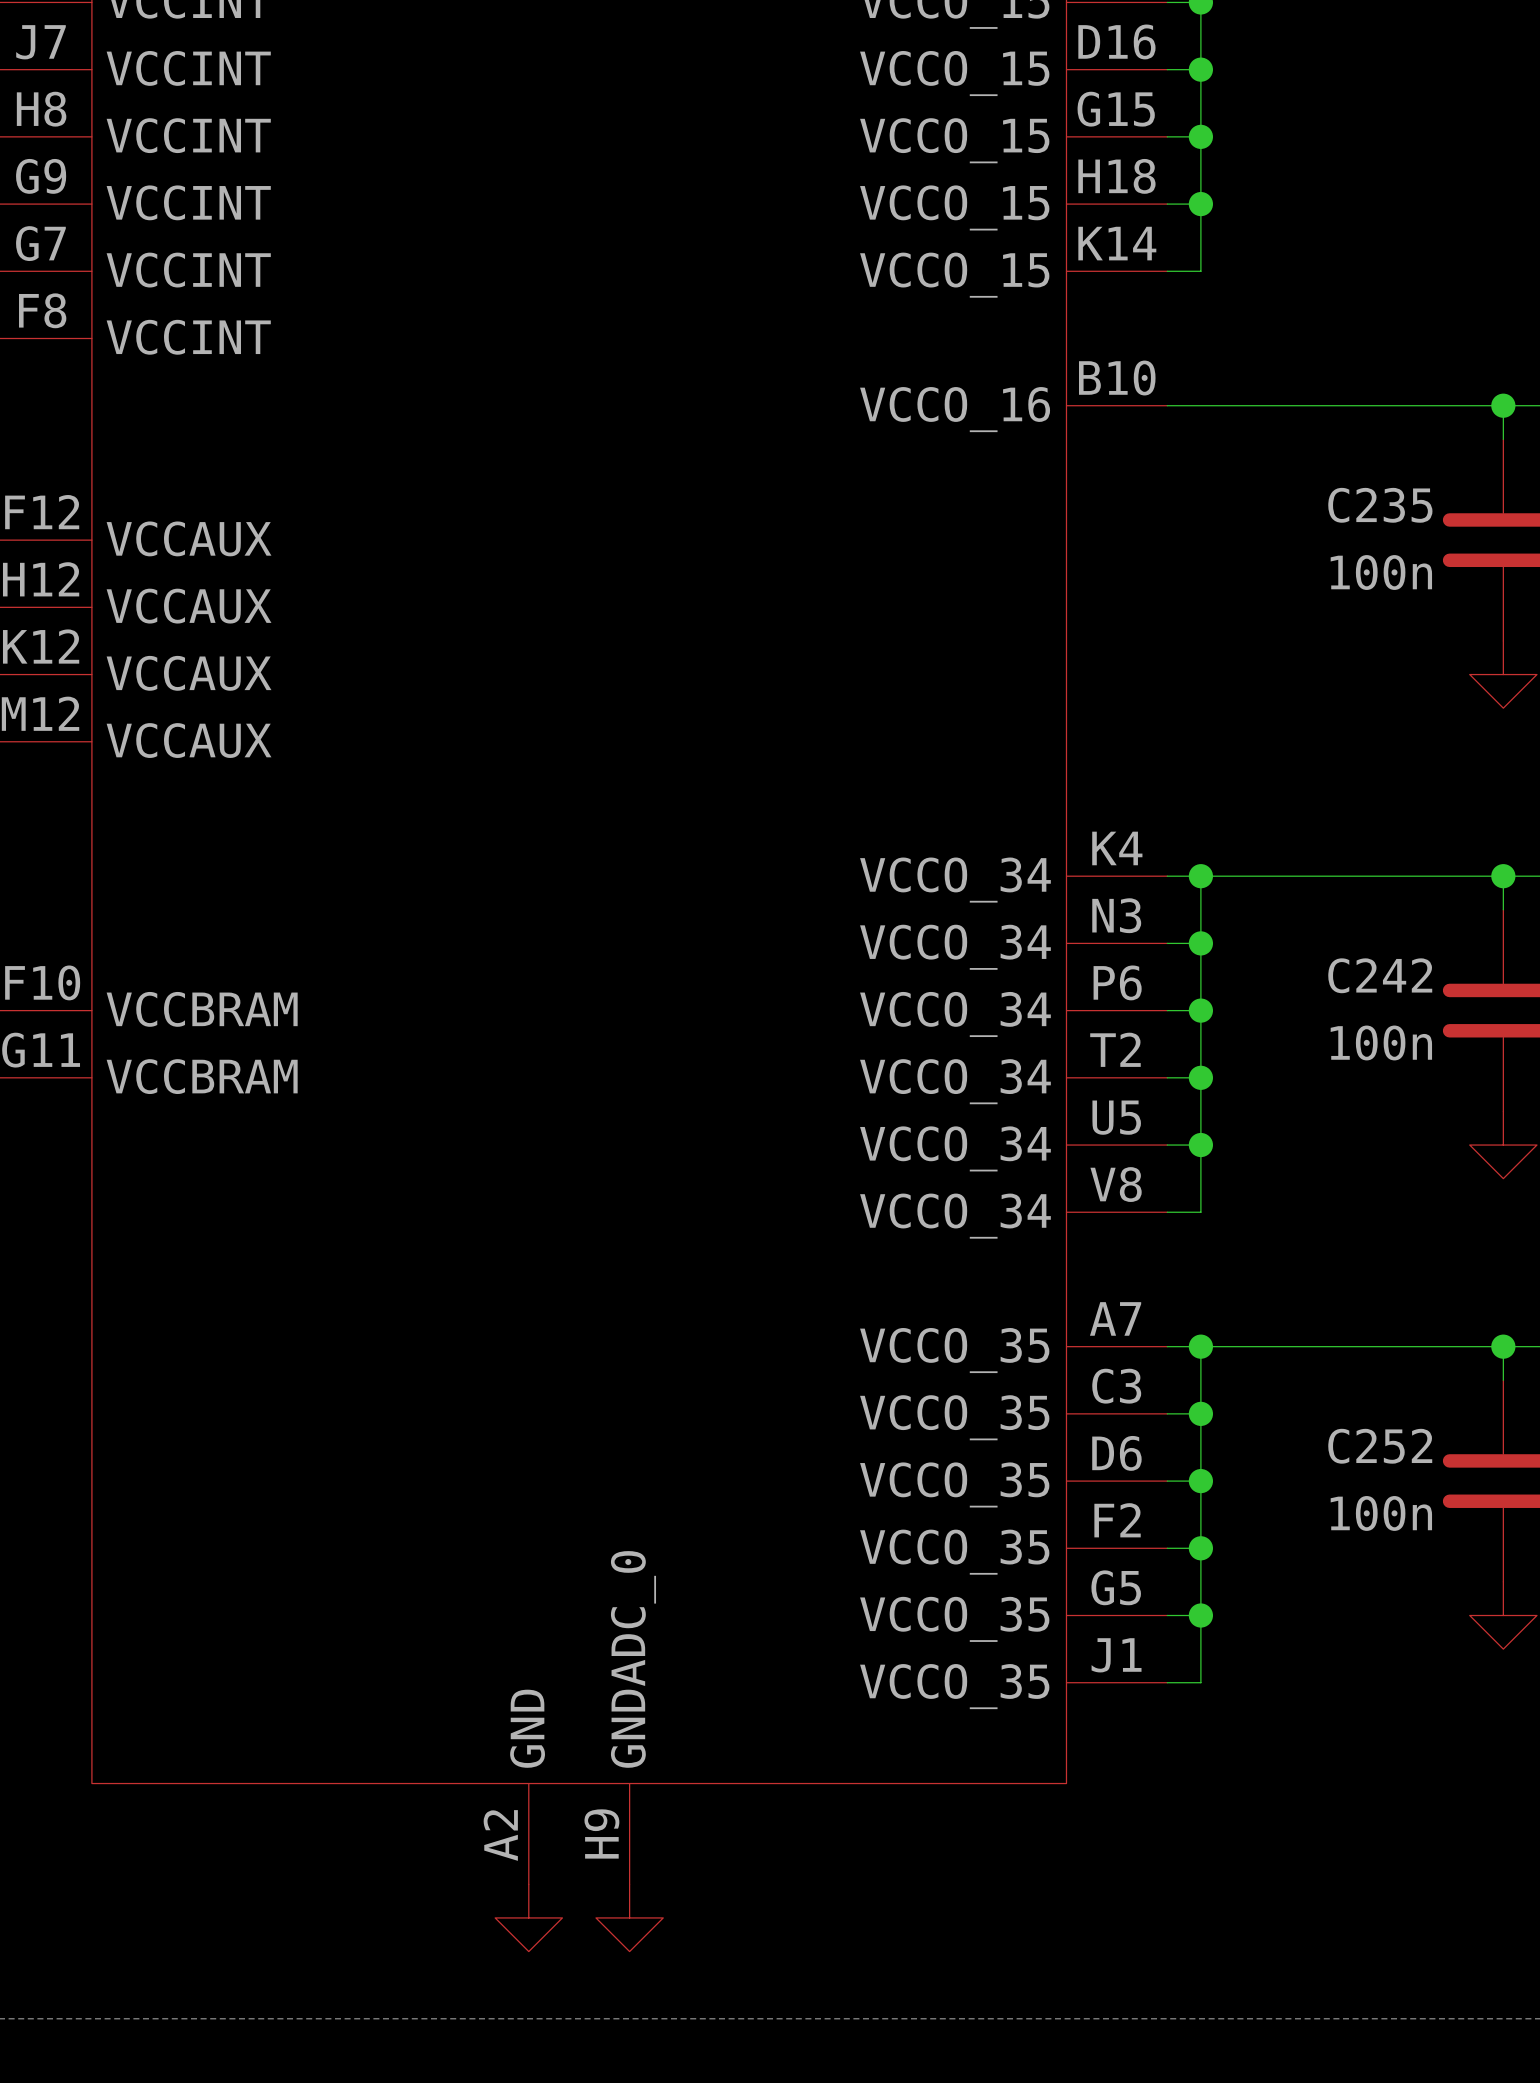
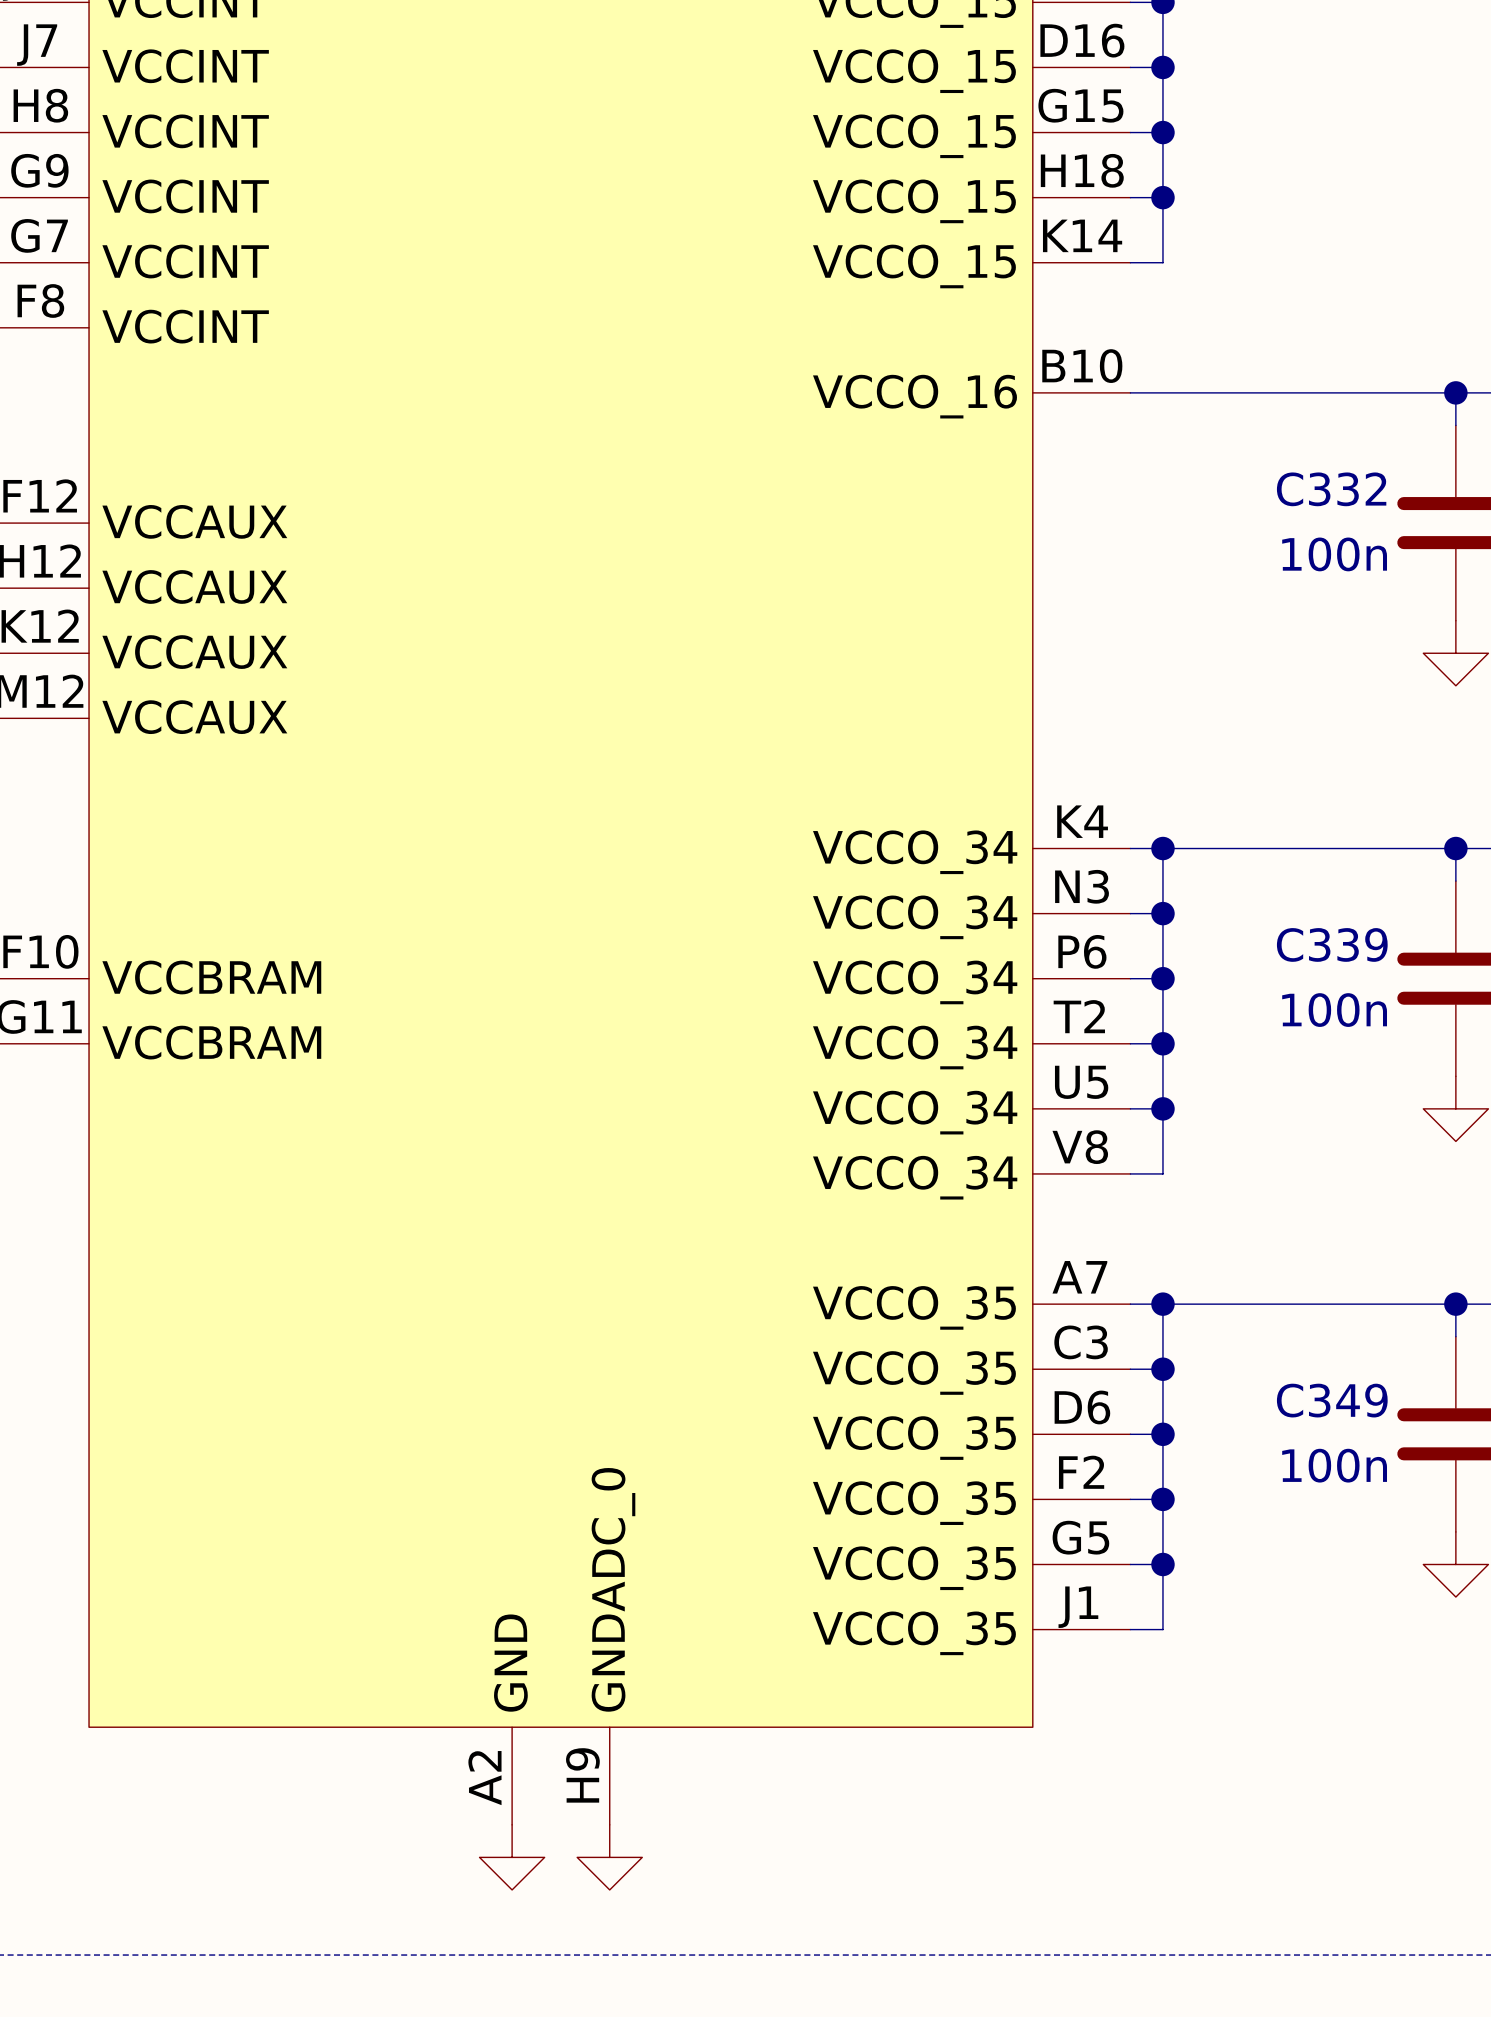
C235 name: C235 (1380, 505) -> C332 (1331, 489)
C242 name: C242 (1380, 975) -> C339 (1332, 944)
C252 name: C252 (1380, 1446) -> C349 (1332, 1400)

